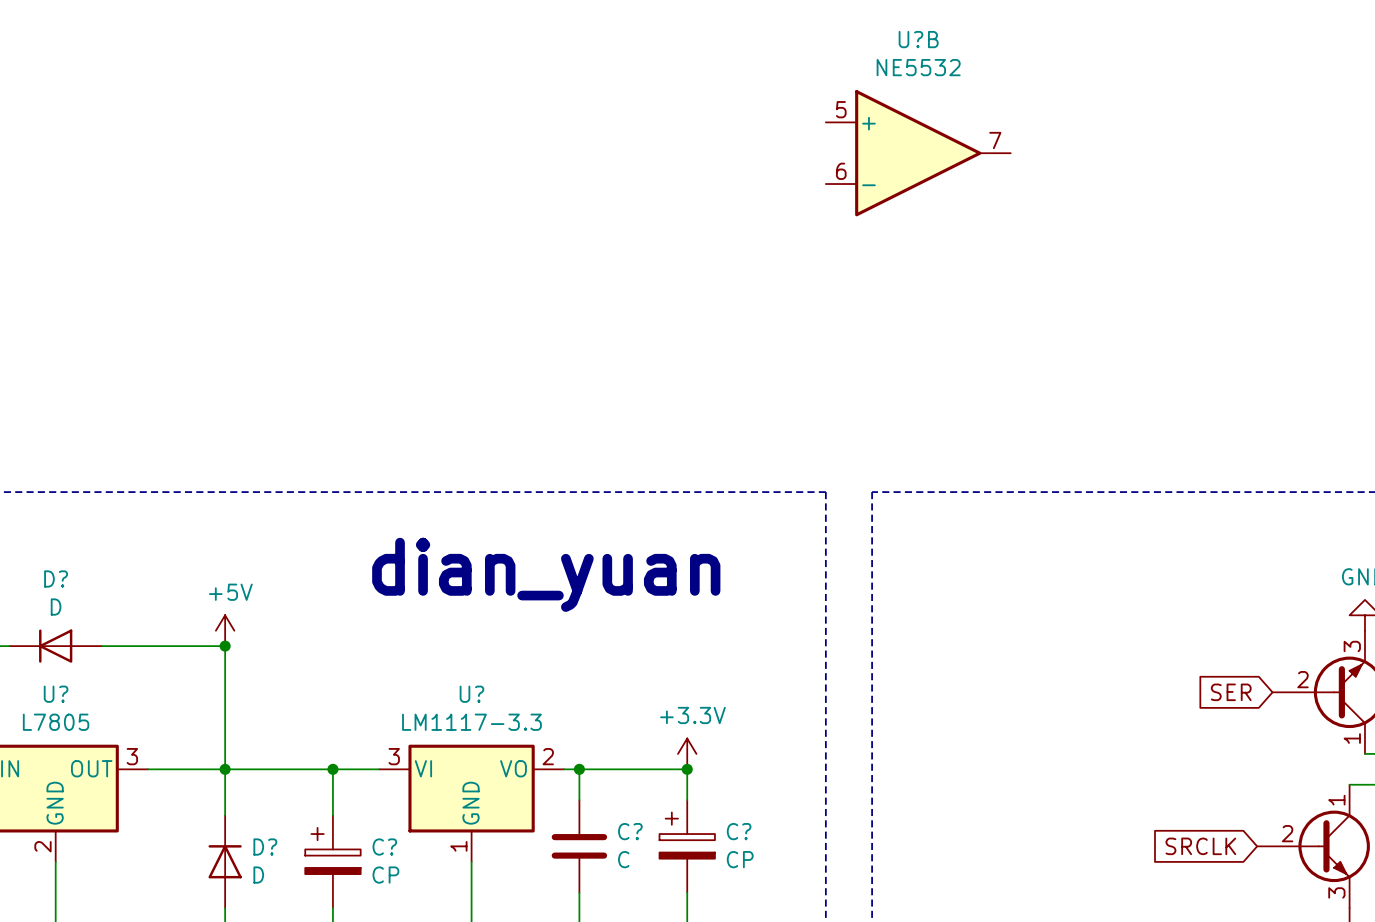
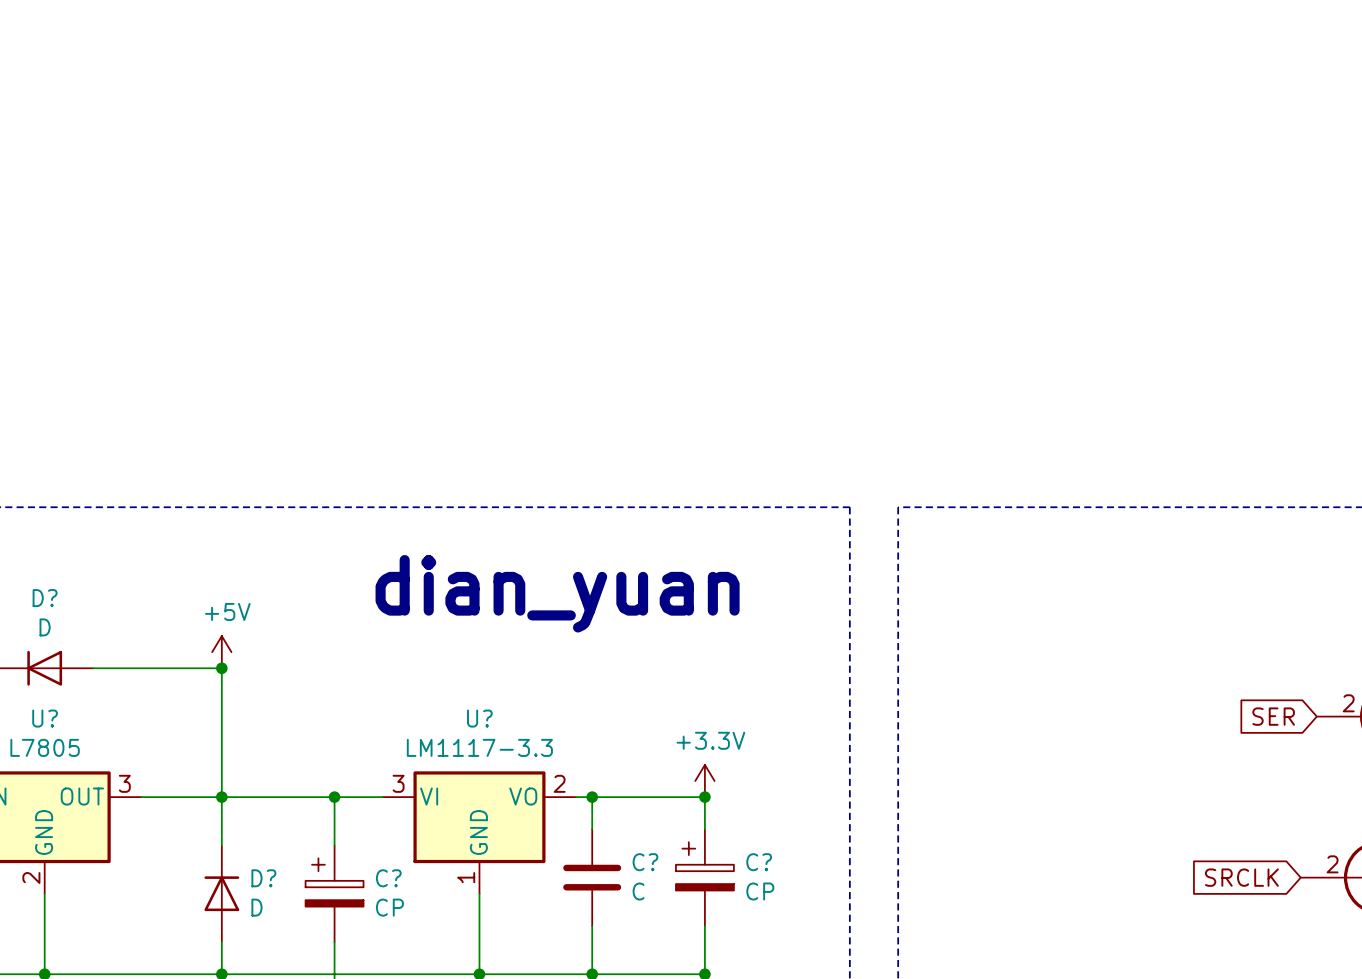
U?B: NE5532 (918, 153) -> none

